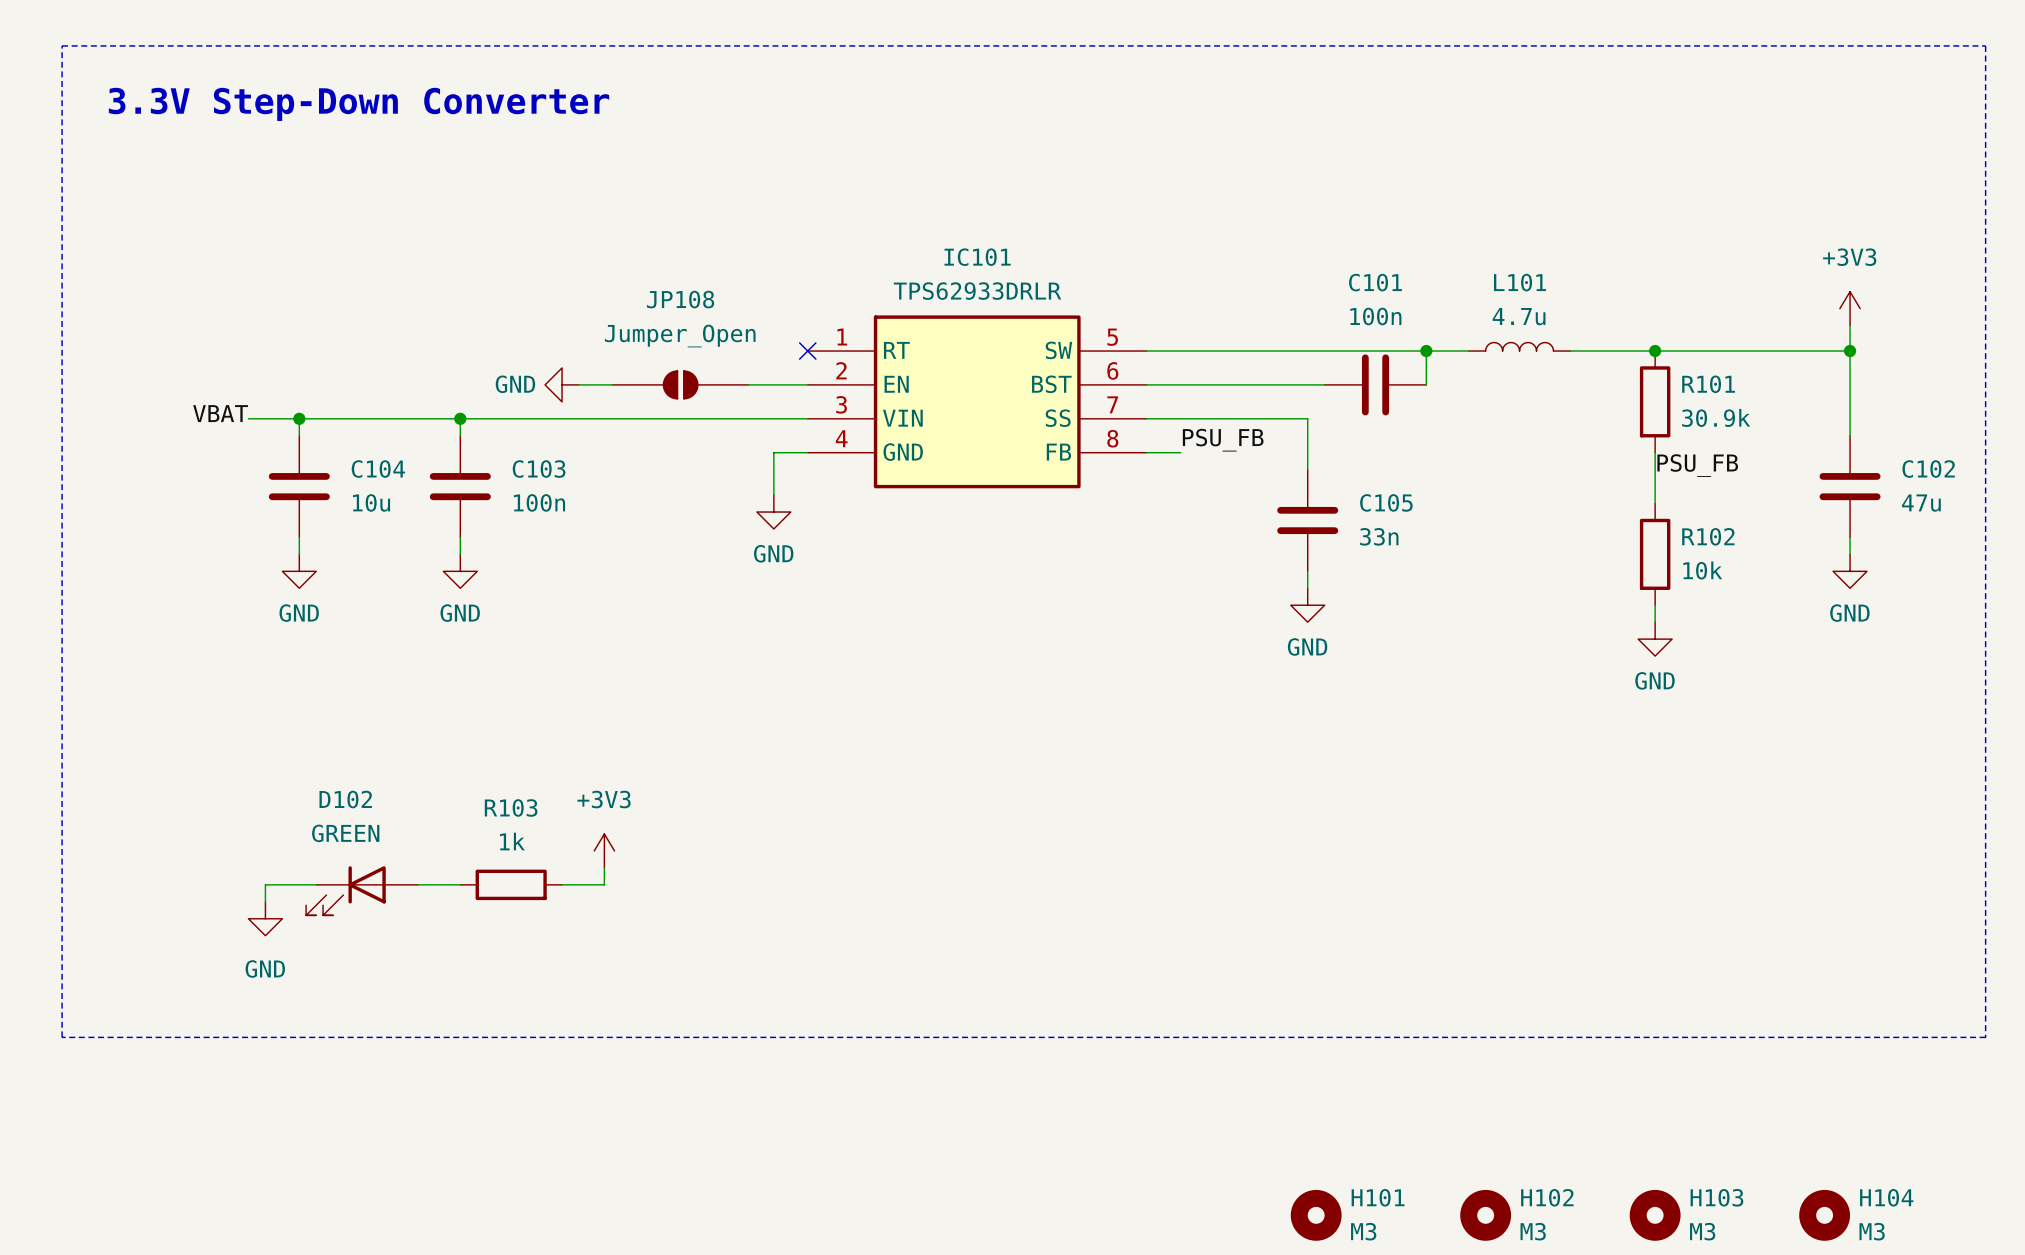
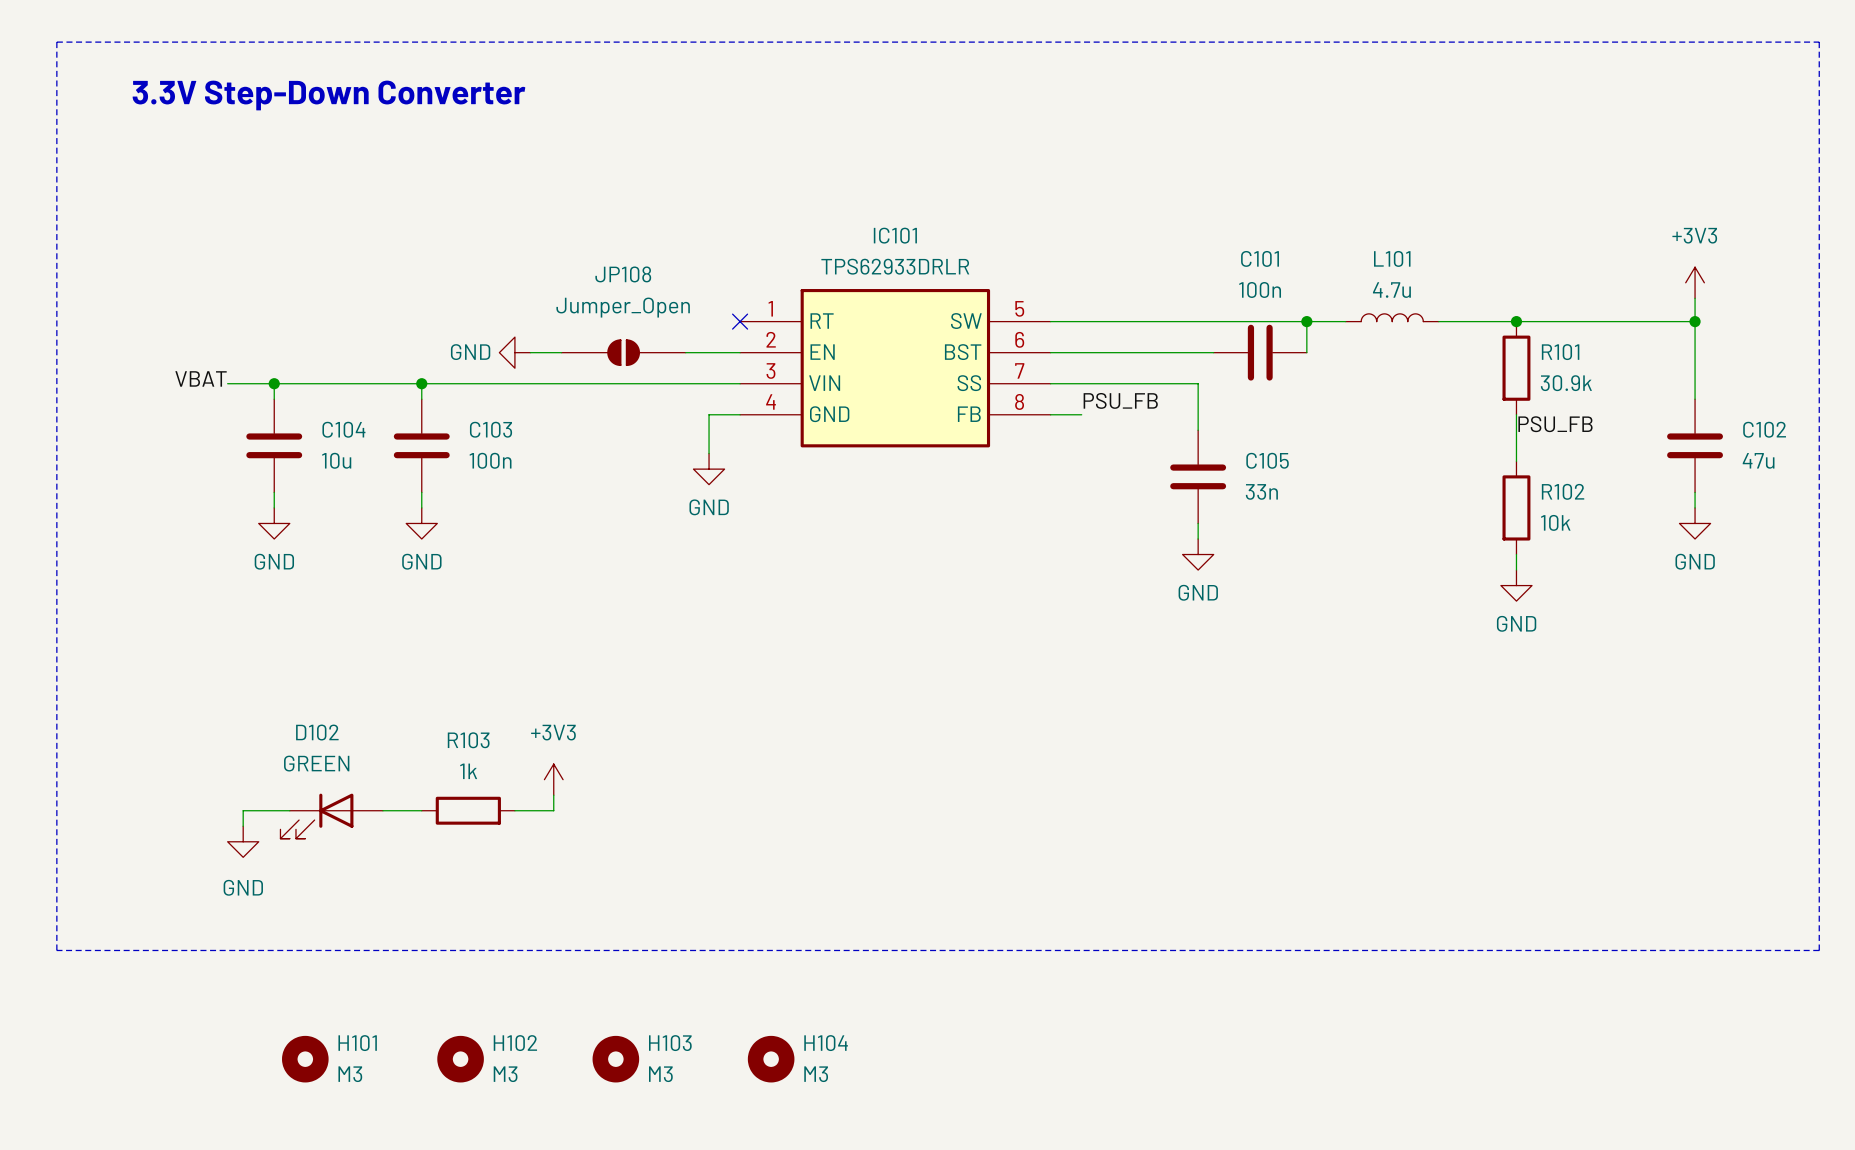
H101 position: (1316, 1215) -> (305, 1059)
H102 position: (1485, 1215) -> (460, 1059)
H103 position: (1655, 1215) -> (615, 1059)
H104 position: (1824, 1215) -> (771, 1059)

